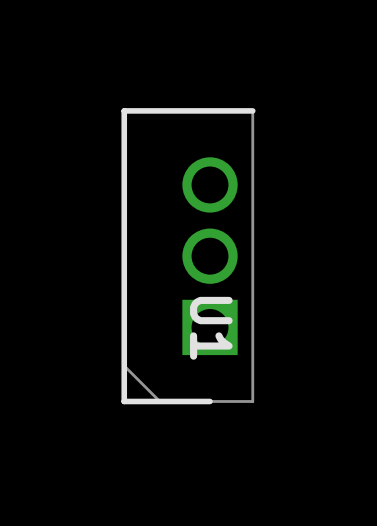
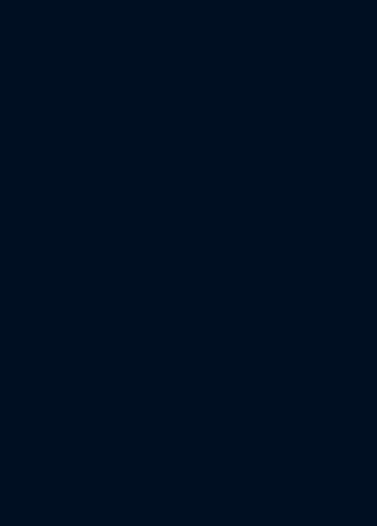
U1: (188, 256) -> none

